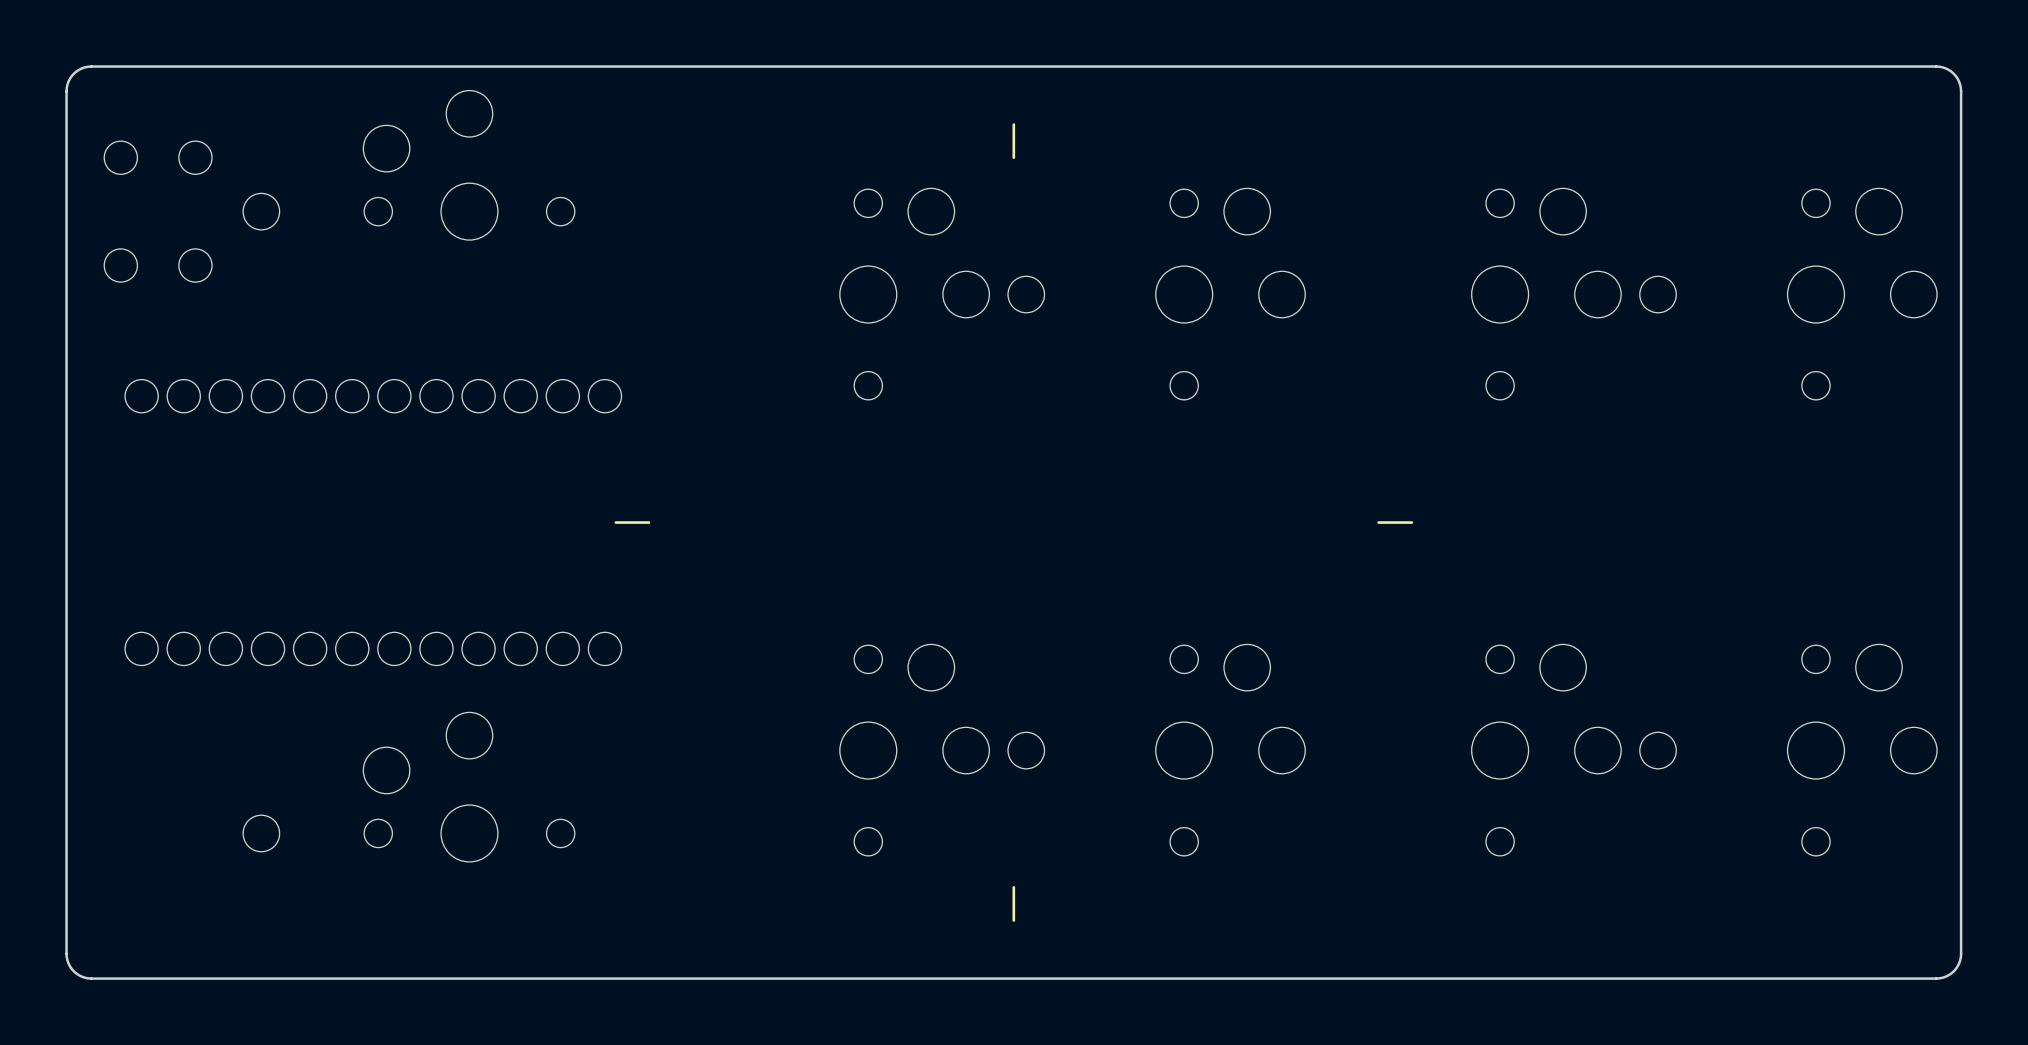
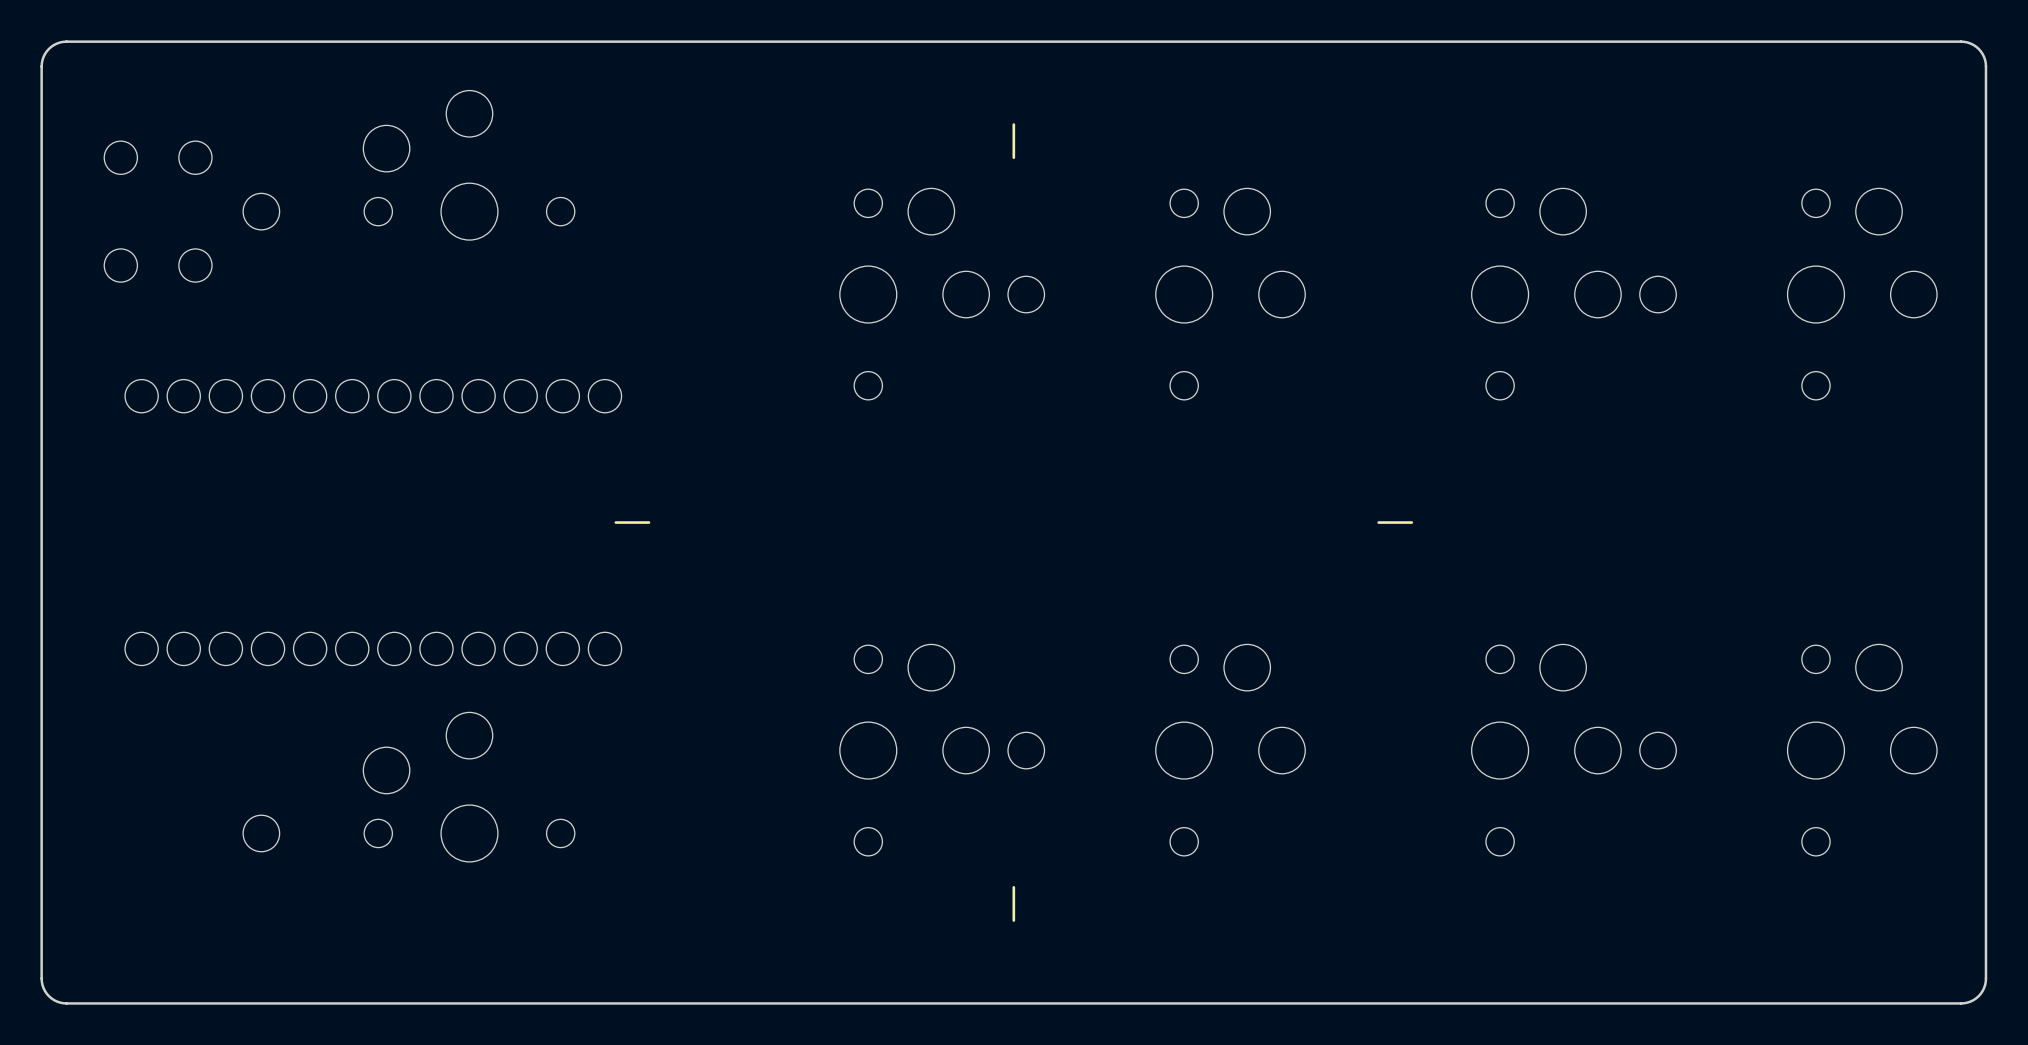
board edge: (1936, 66) (91, 66) (81, 68) (71, 76) (66, 91) (66, 953) (68, 963) (76, 973) (91, 978) (1936, 978) (1945, 976) (1957, 966) (1961, 953) (1961, 91) (1959, 81) (1953, 73) (1945, 68) (1936, 66) -> (1961, 41) (1970, 43) (1978, 48) (1984, 57) (1985, 66) (1985, 978) (1982, 991) (1973, 1000) (1961, 1003) (66, 1003) (54, 1000) (44, 991) (41, 978) (41, 66) (44, 54) (54, 44) (66, 41) (1961, 41)

